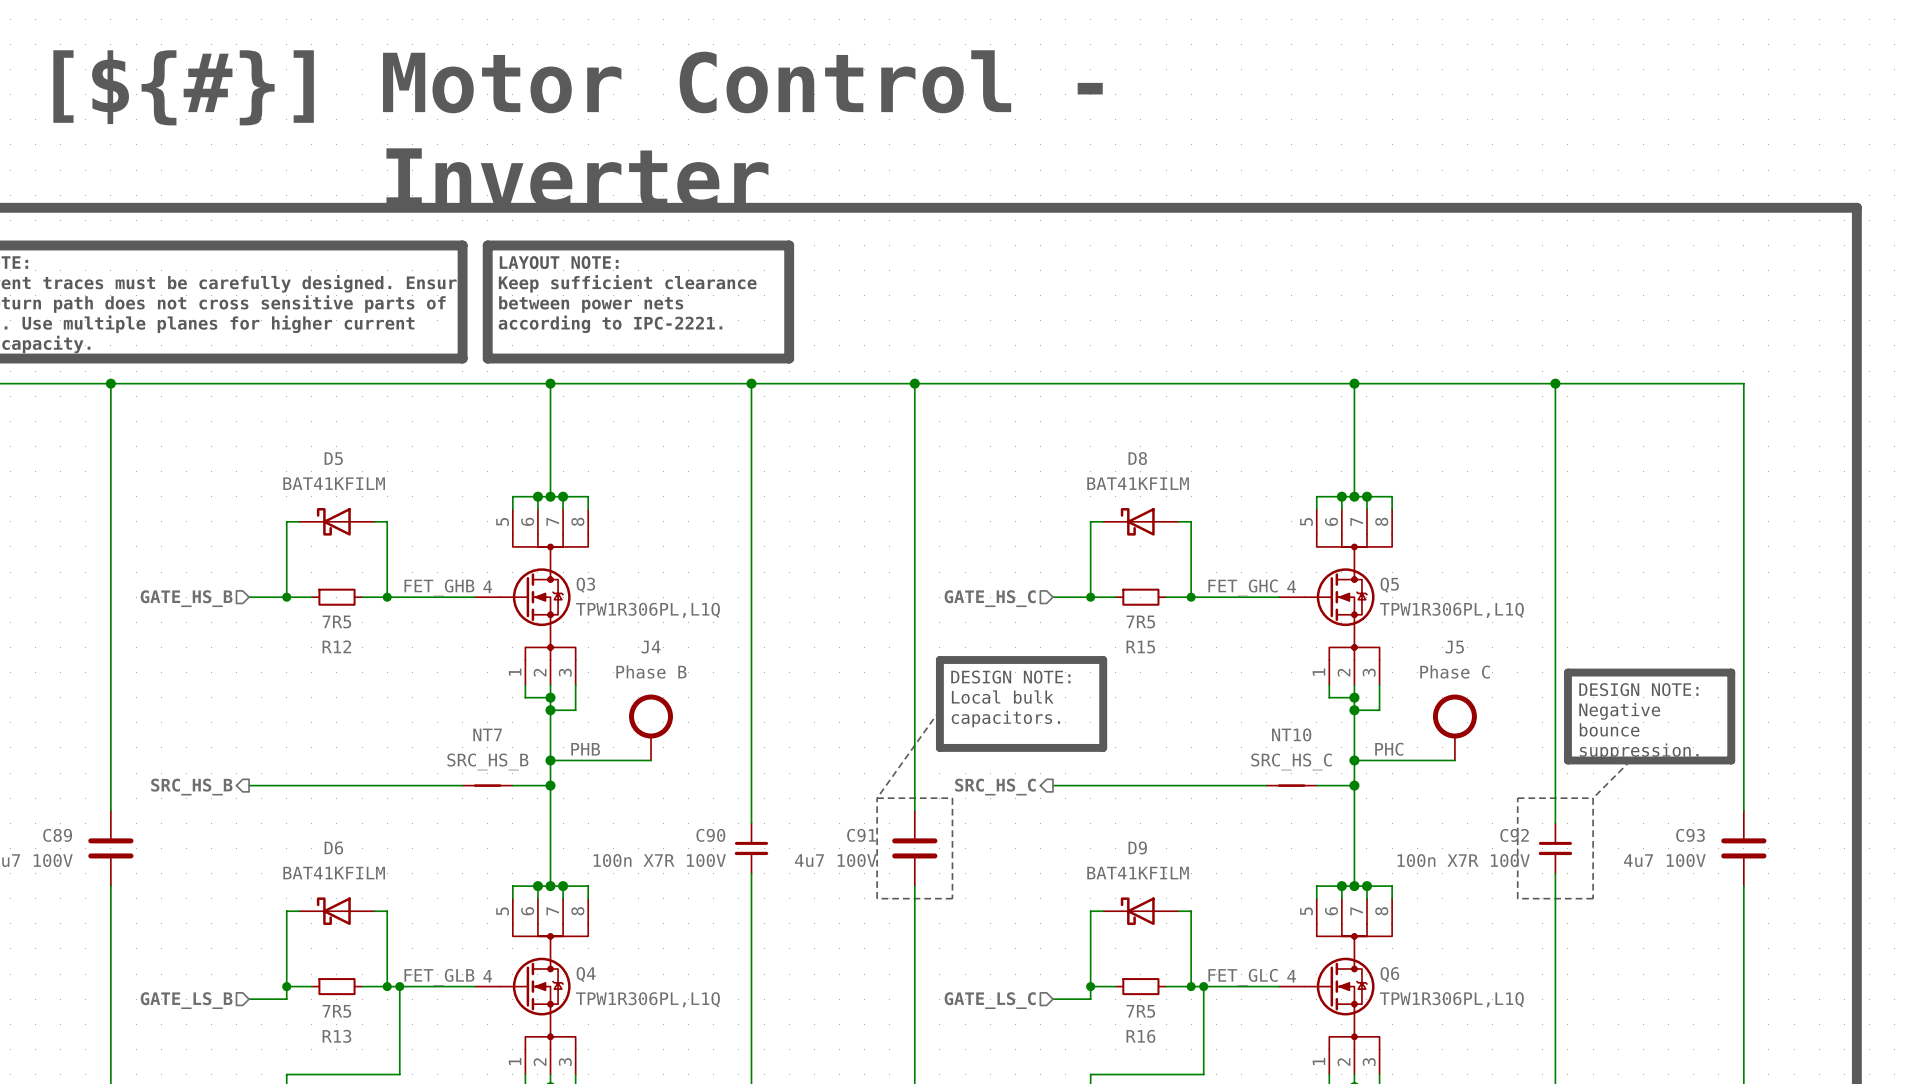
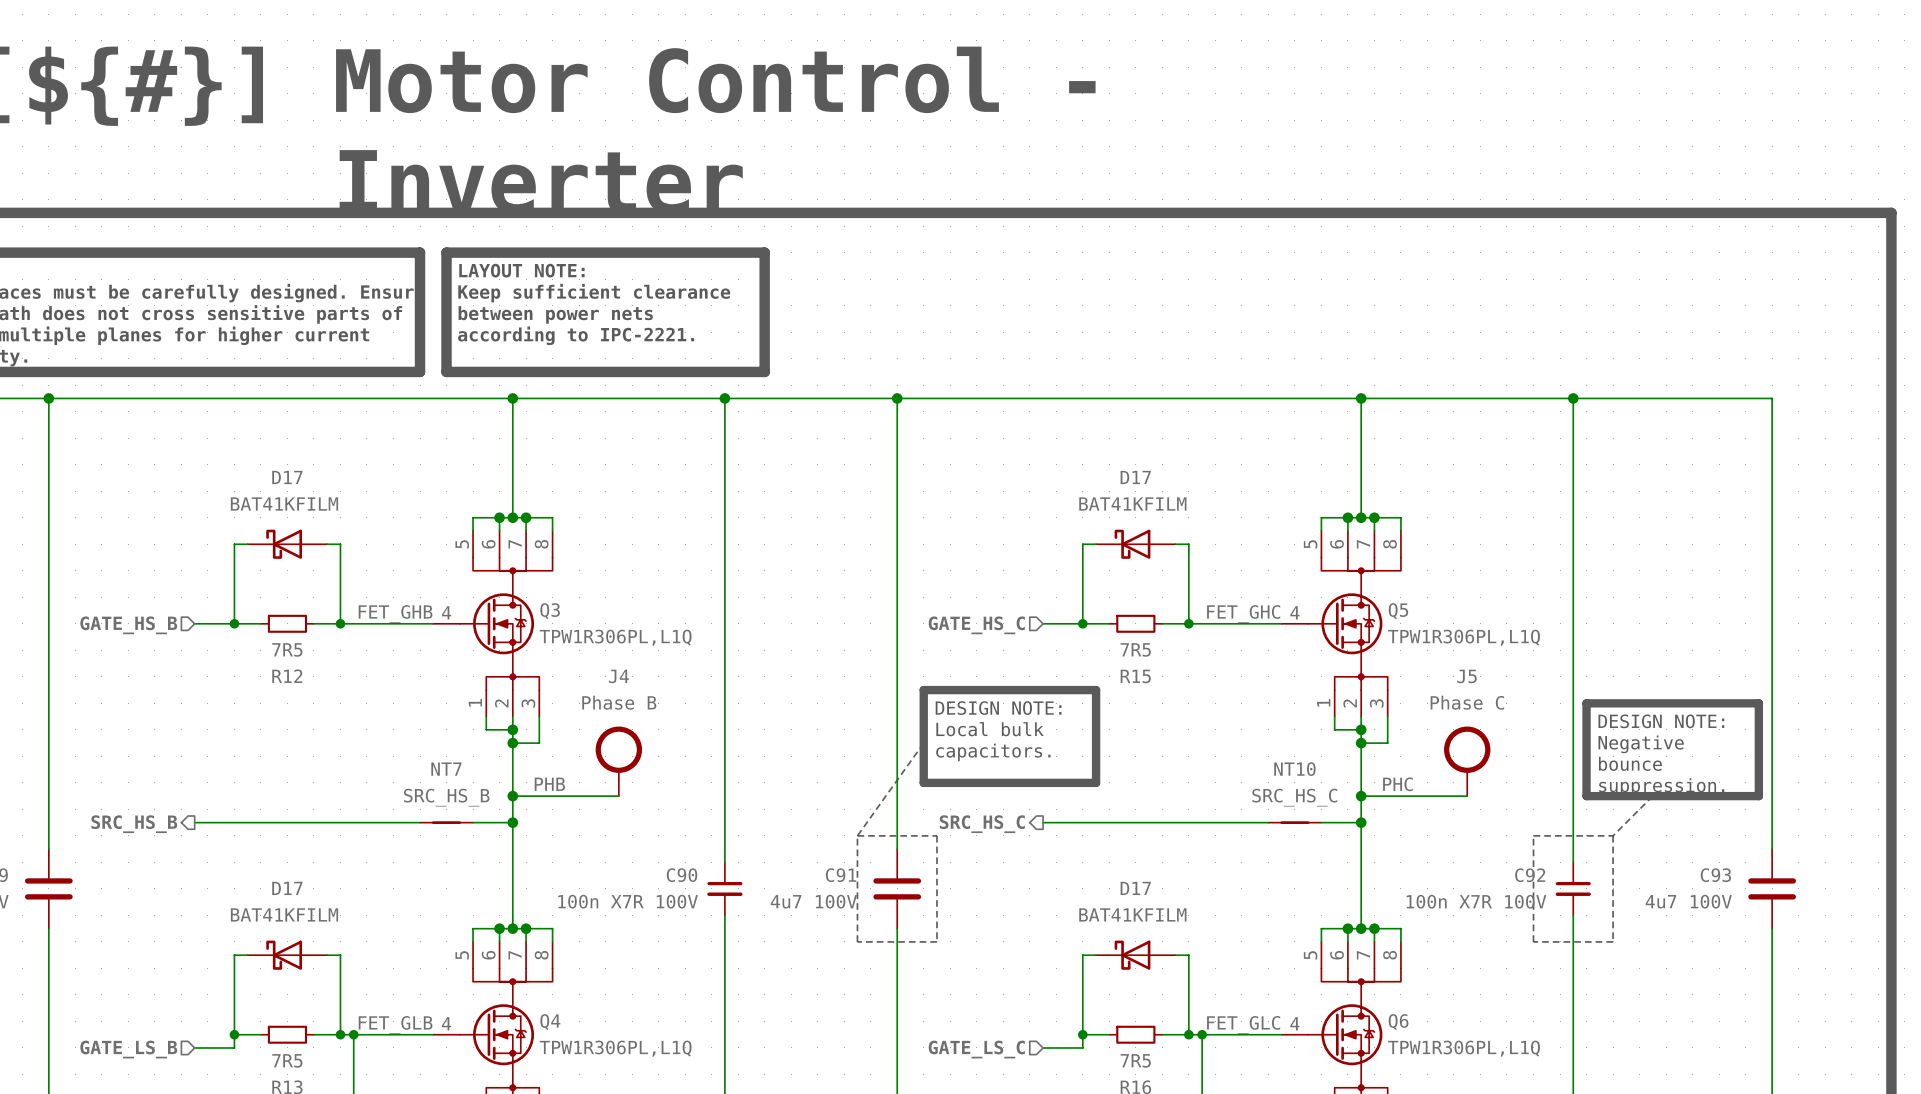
D5 name: D5 (333, 458) -> D17 (287, 477)
D8 name: D8 (1137, 458) -> D17 (1135, 477)
D6 name: D6 (333, 847) -> D17 (287, 888)
D9 name: D9 (1137, 847) -> D17 (1135, 888)

